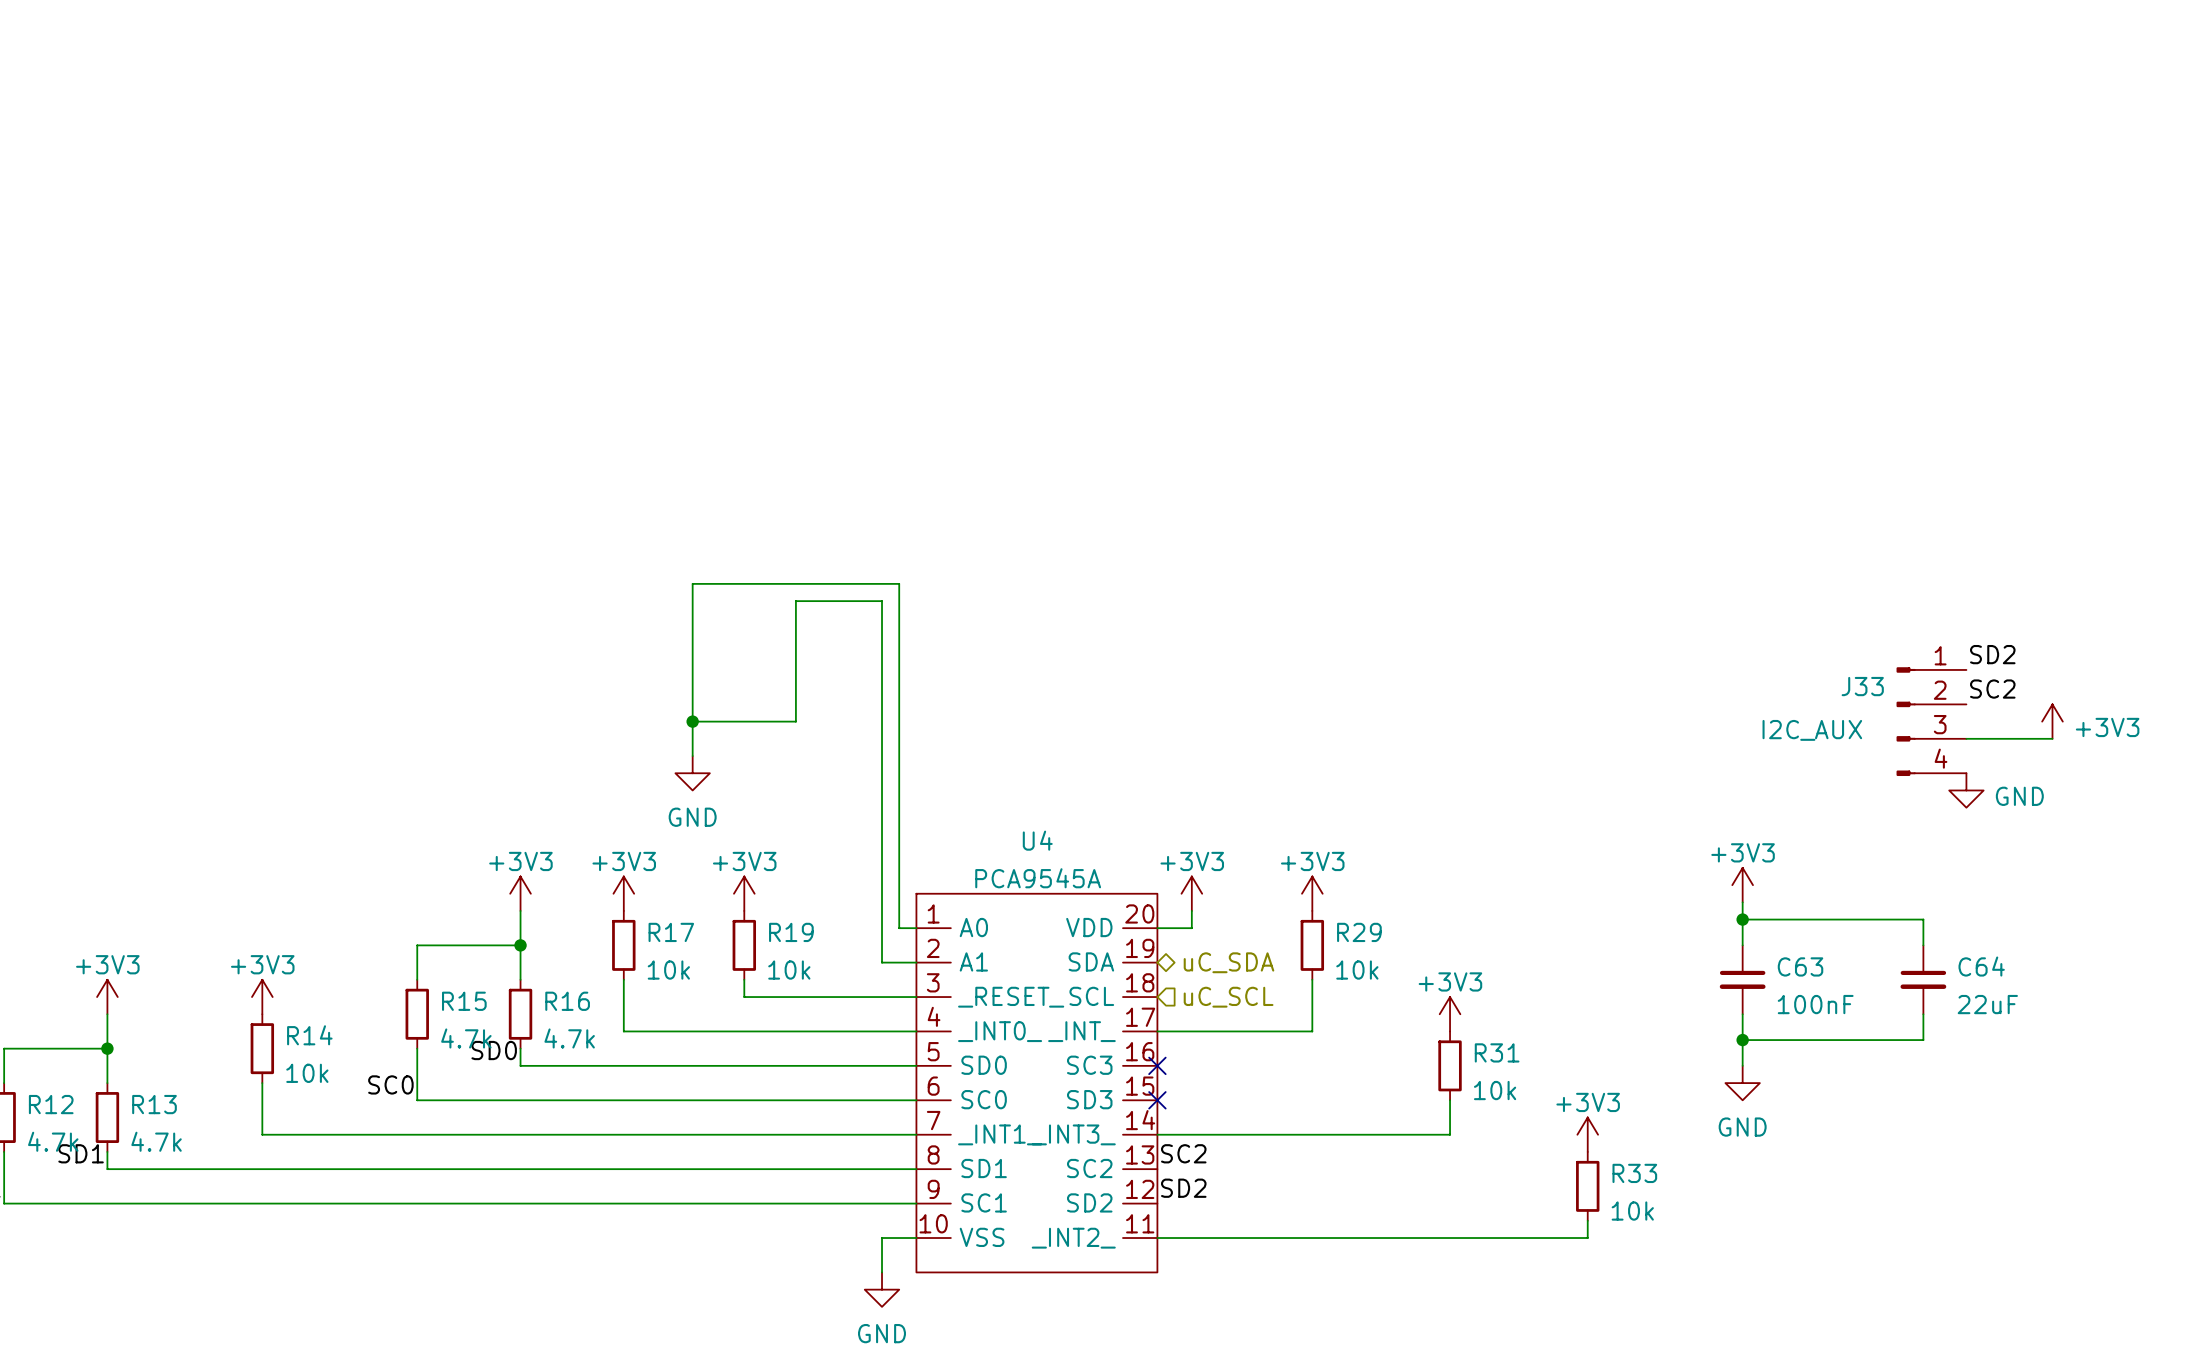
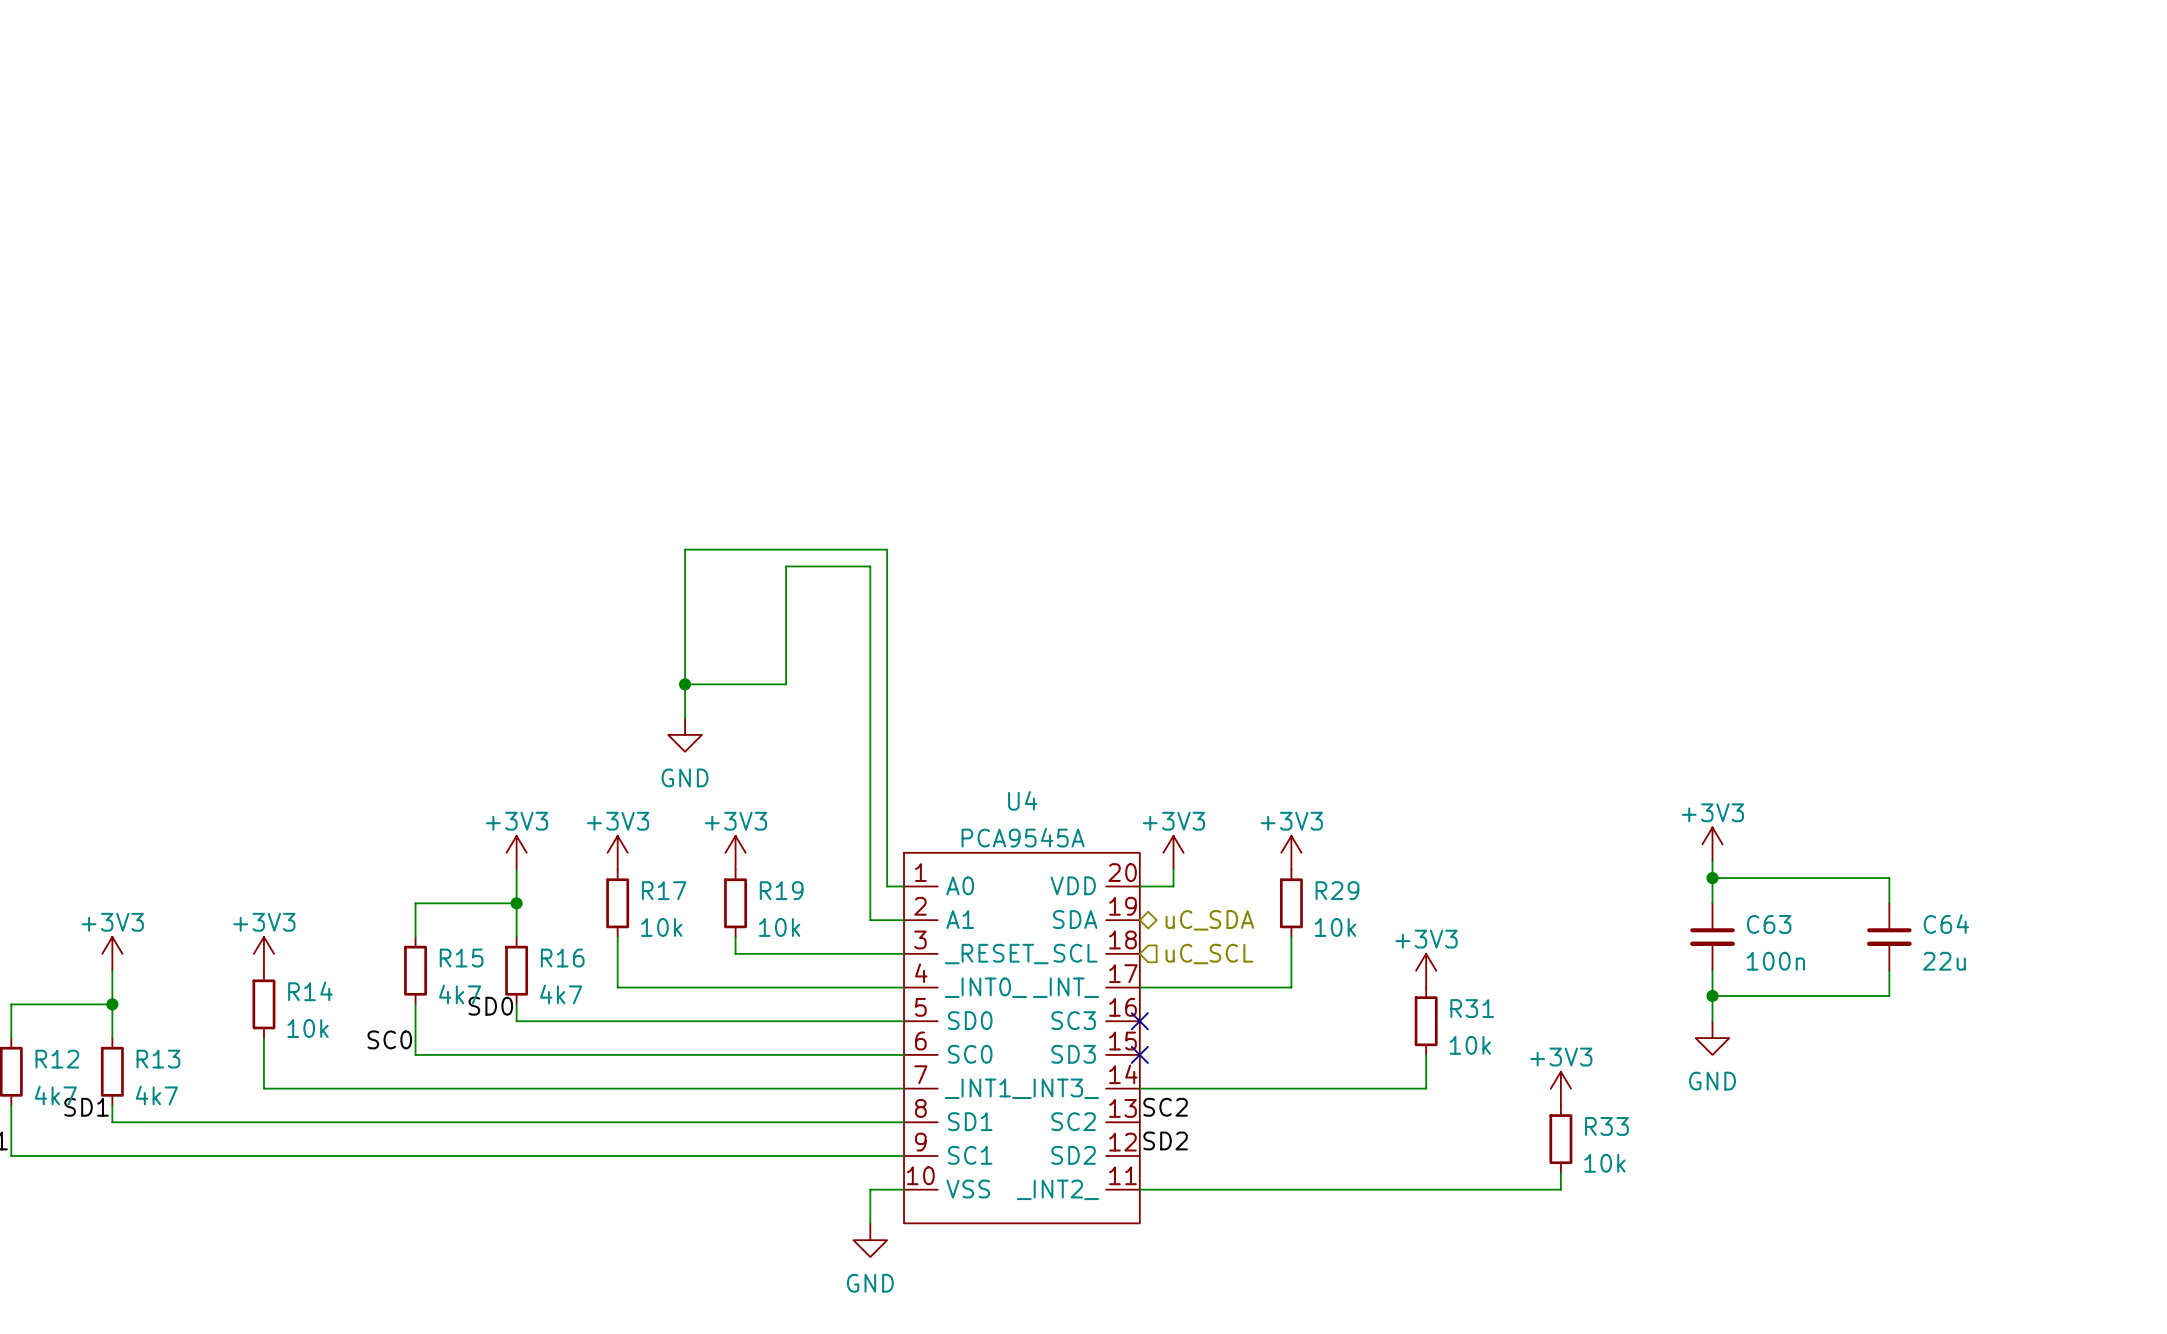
label: SD2 (1992, 654) -> none
label: SC2 (1992, 689) -> none
J33: I2C_AUX (1931, 721) -> none
power symbol: +3V3 (2052, 721) -> none
wire: (1966, 738) (2052, 738) -> none
power symbol: GND (1966, 790) -> none
C63 value: 100nF (1815, 1004) -> 100n (1775, 961)
C64 value: 22uF (1987, 1004) -> 22u (1944, 961)
R15 value: 4.7k (466, 1038) -> 4k7 (460, 994)
R16 value: 4.7k (569, 1038) -> 4k7 (561, 994)
R12 value: 4.7k (53, 1141) -> 4k7 (55, 1095)
R13 value: 4.7k (156, 1141) -> 4k7 (156, 1095)

